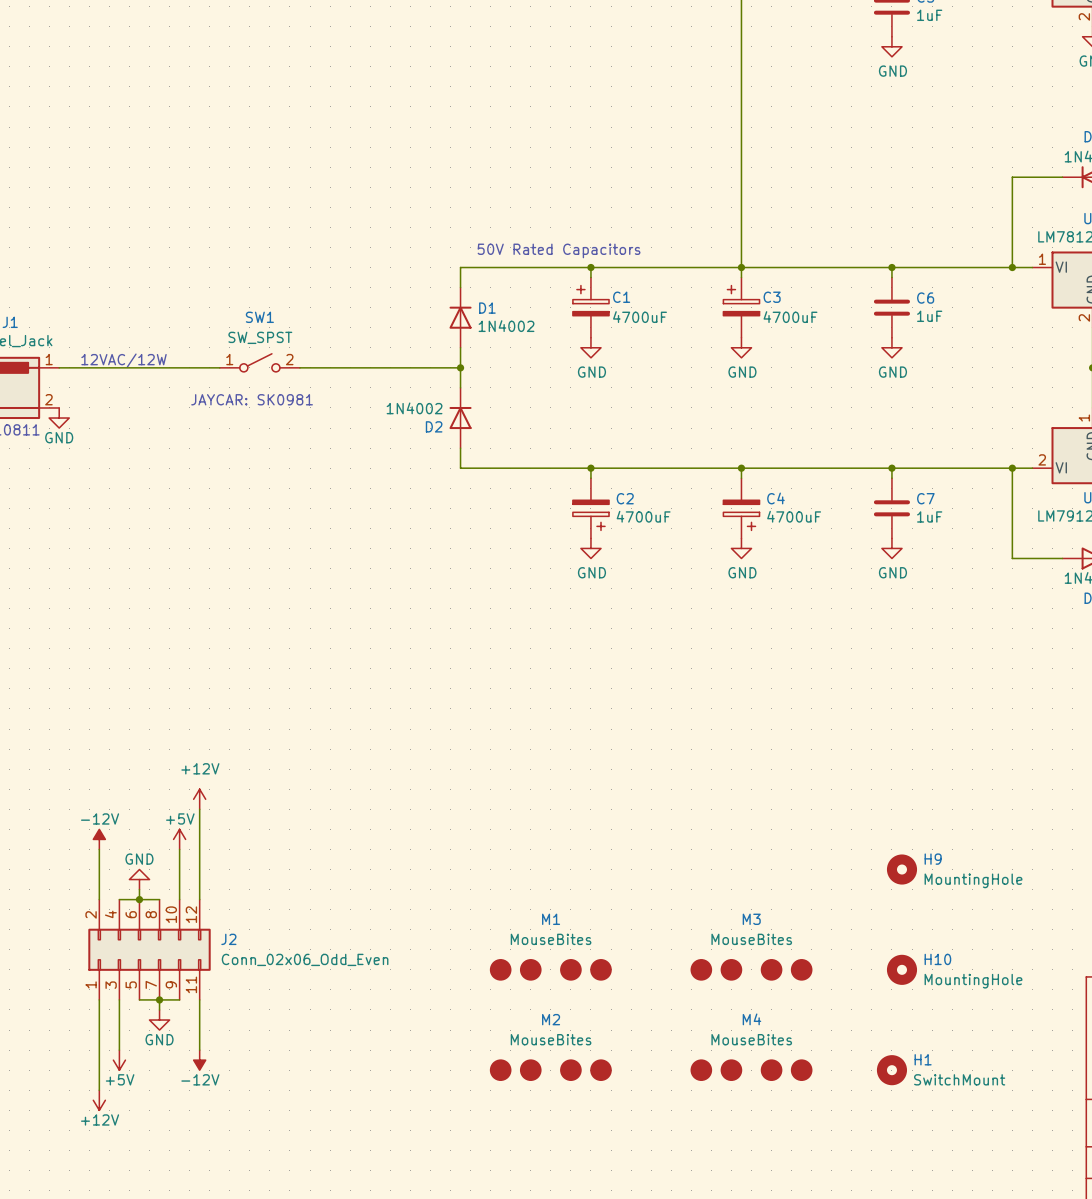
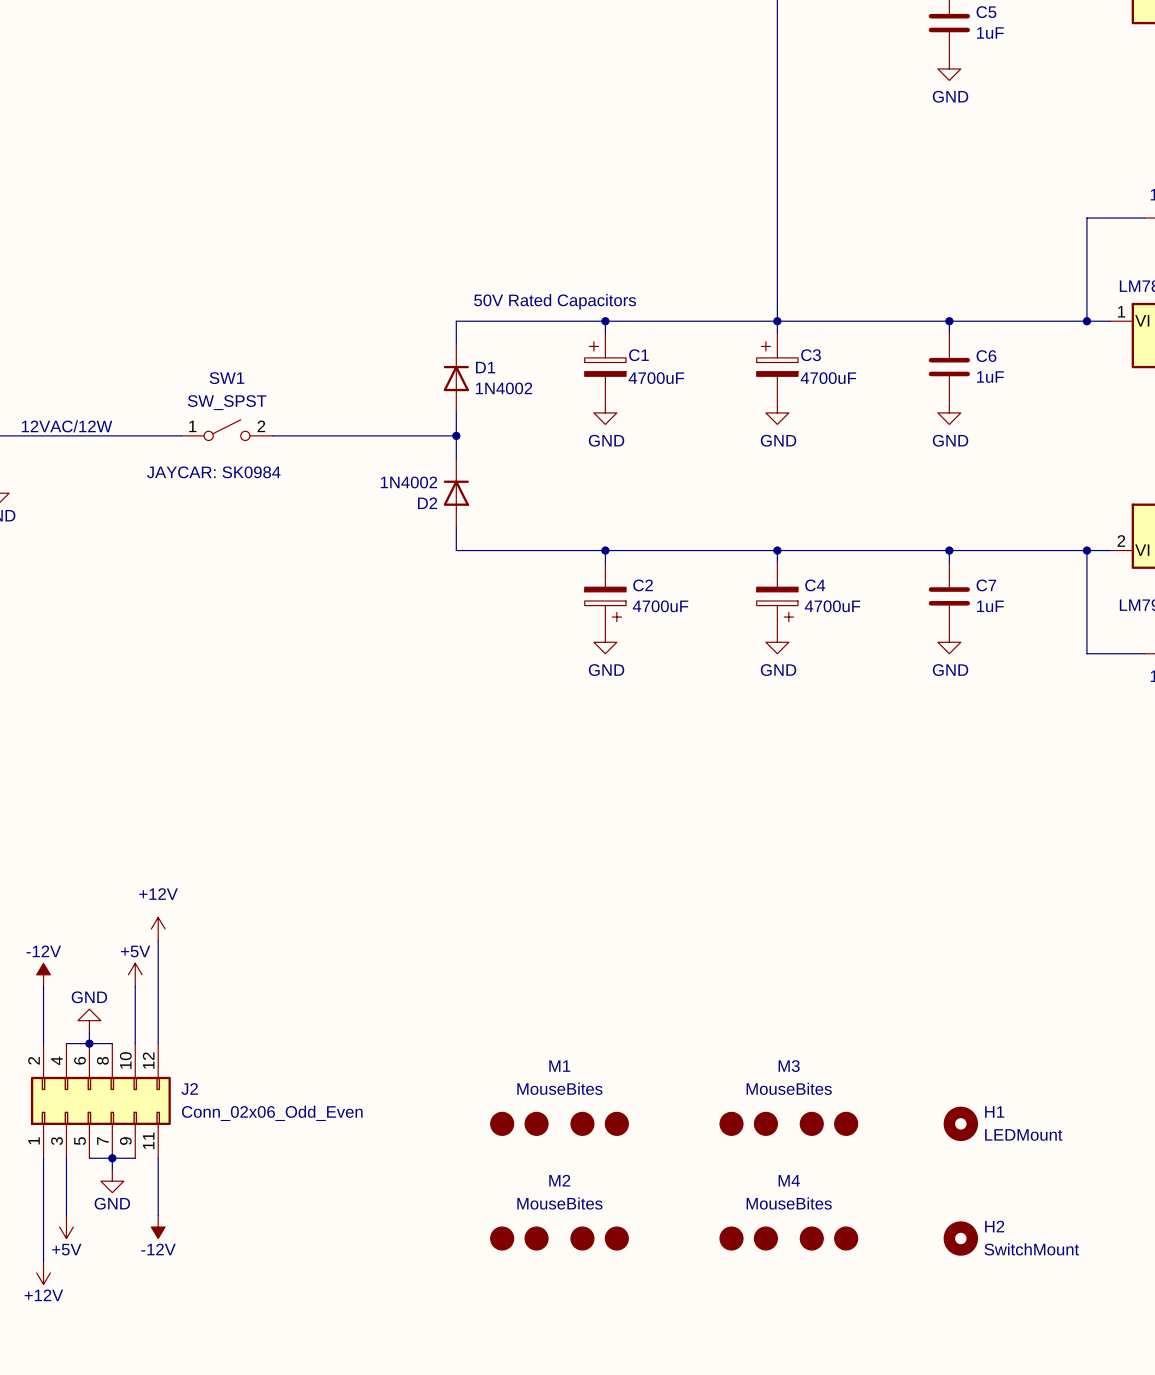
text: JAYCAR: SK0981 (252, 399) -> JAYCAR: SK0984 (213, 472)
H9: MountingHole (901, 869) -> none
H10 name: H10 (937, 959) -> H1 (994, 1111)
H10 value: MountingHole (973, 981) -> LEDMount (1023, 1134)
H1: SwitchMount (891, 1070) -> none
H2: none -> SwitchMount (960, 1238)

